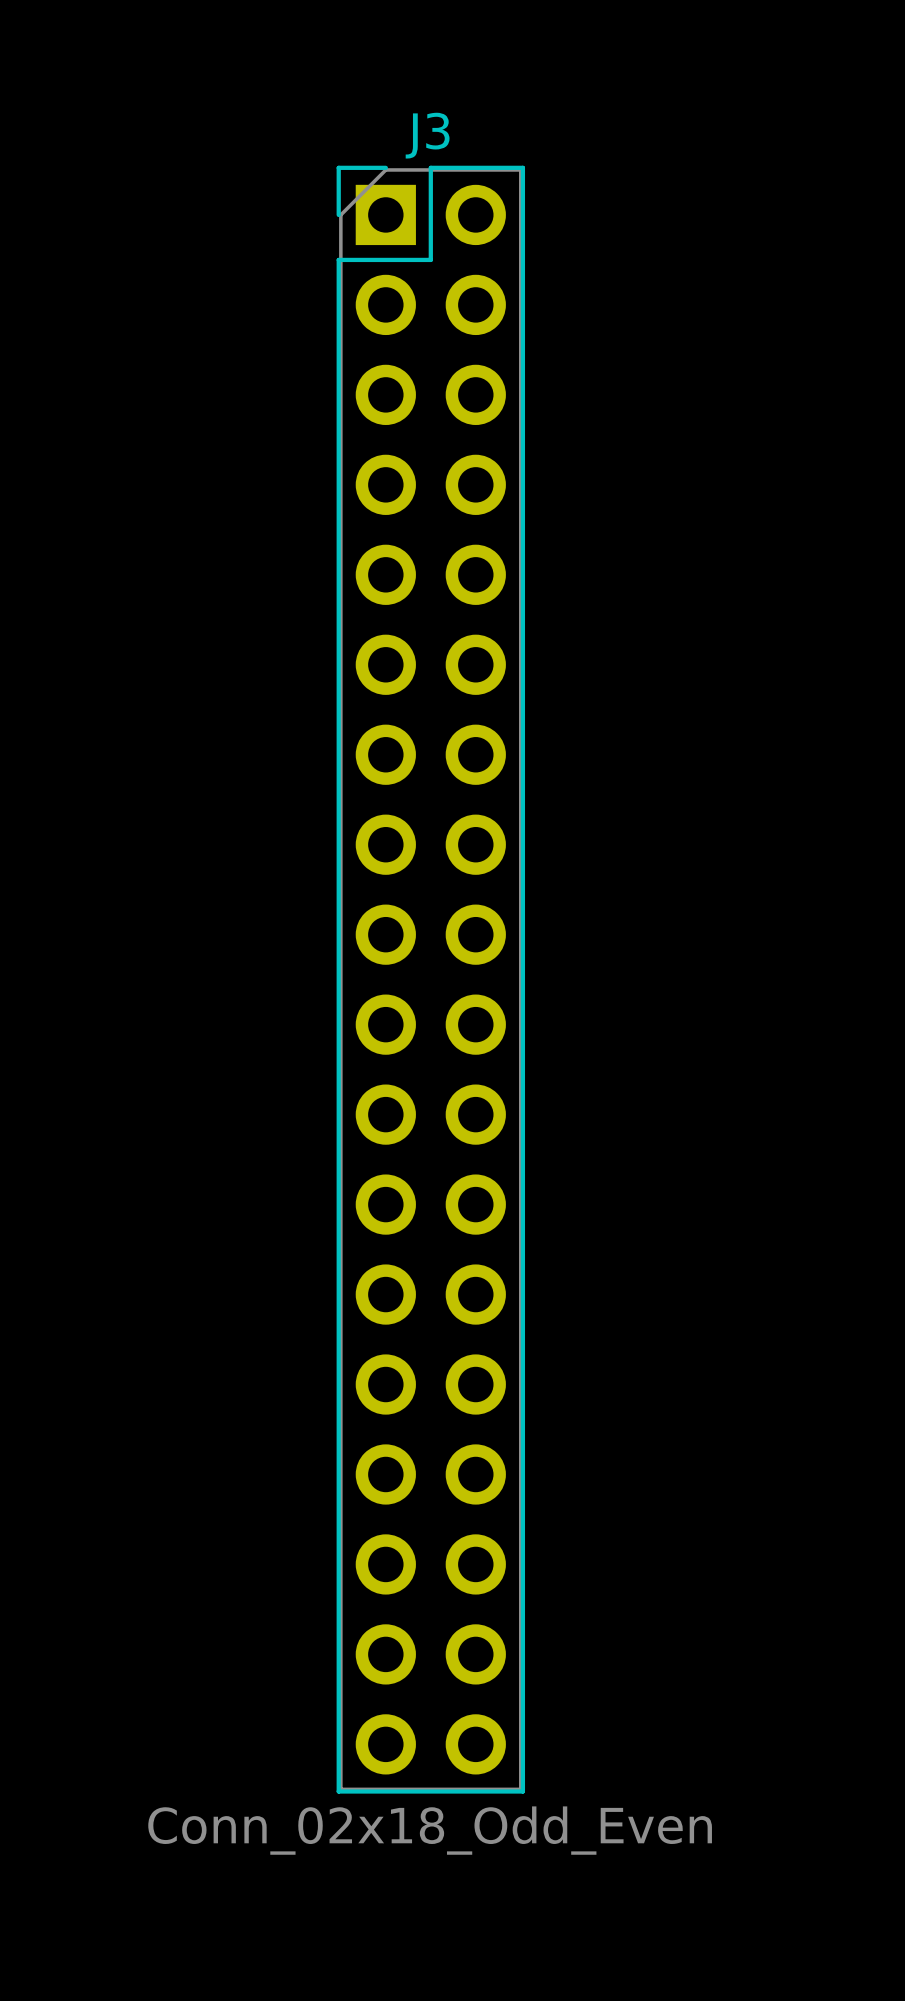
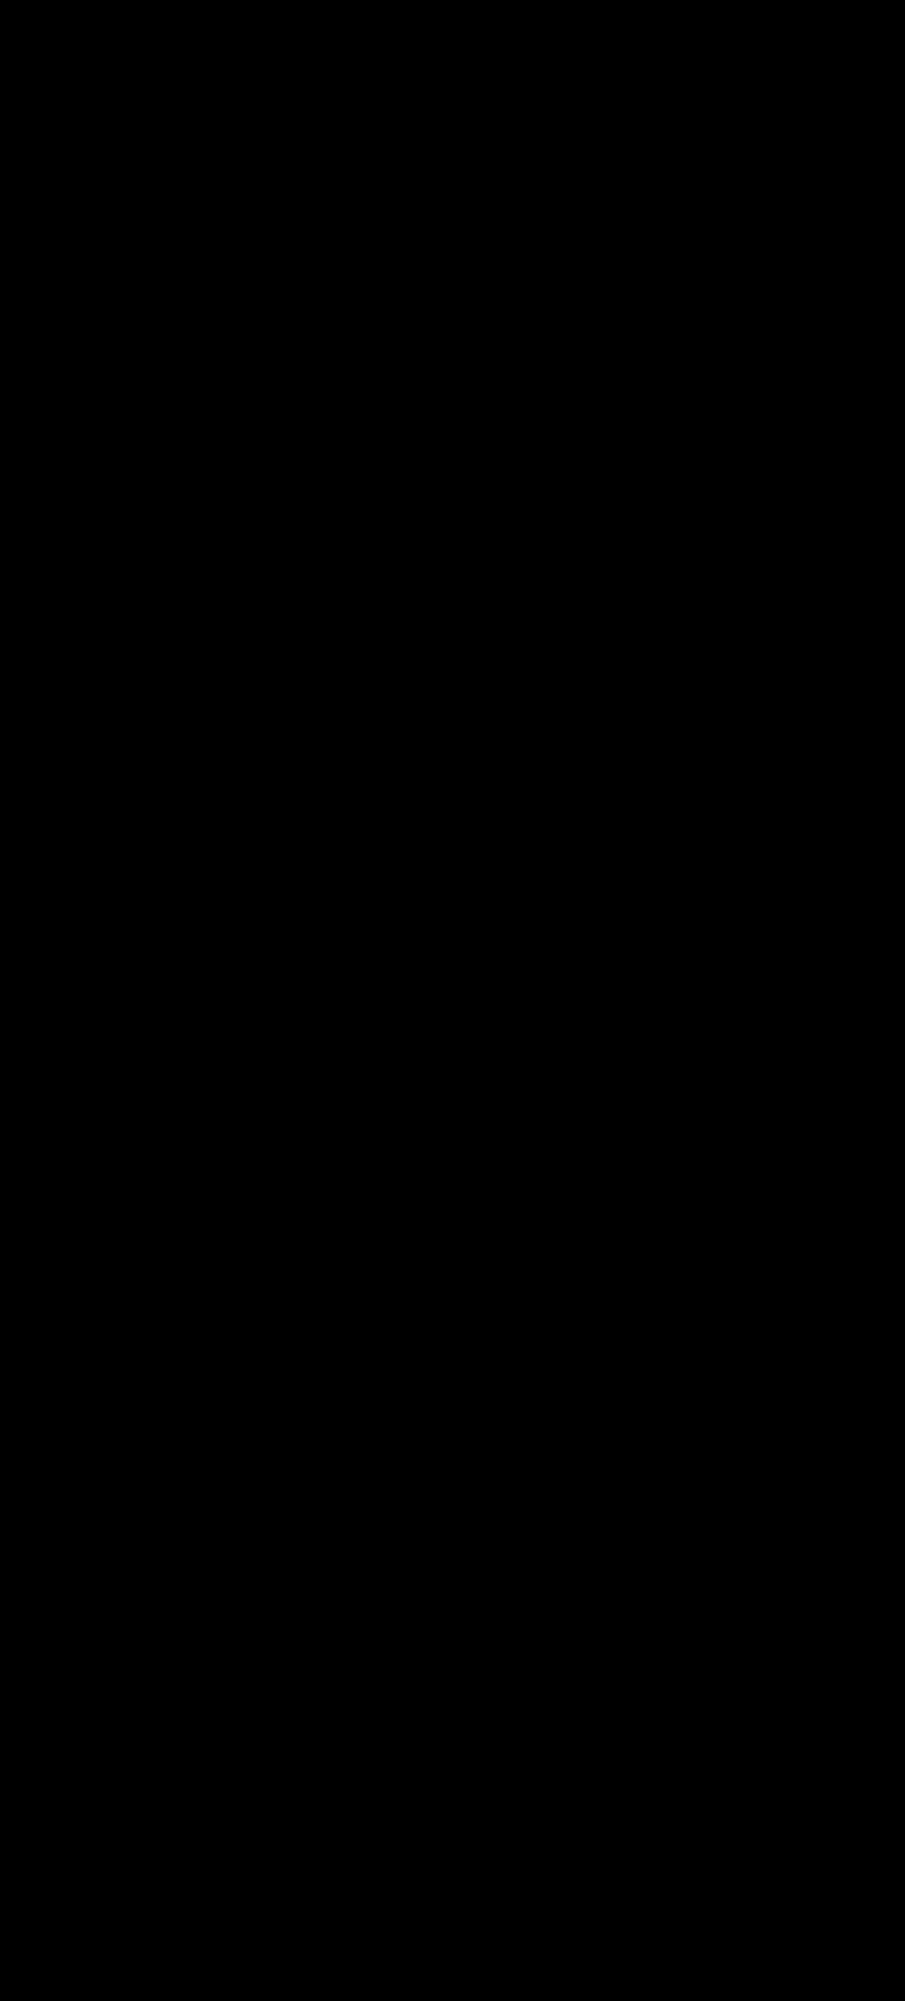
J3: Conn_02x18_Odd_Even (430, 979) -> none

